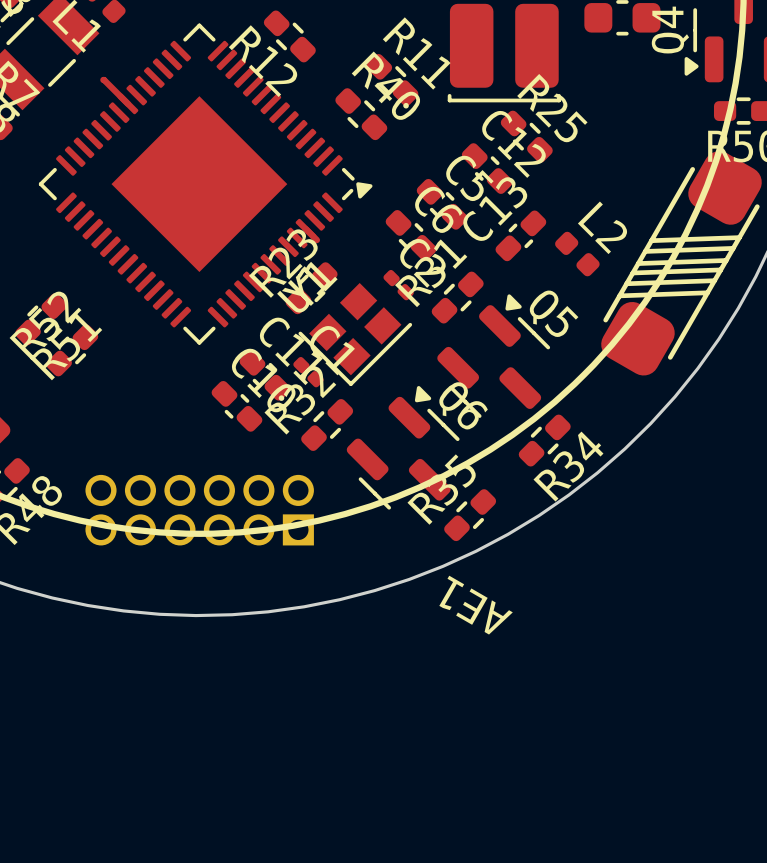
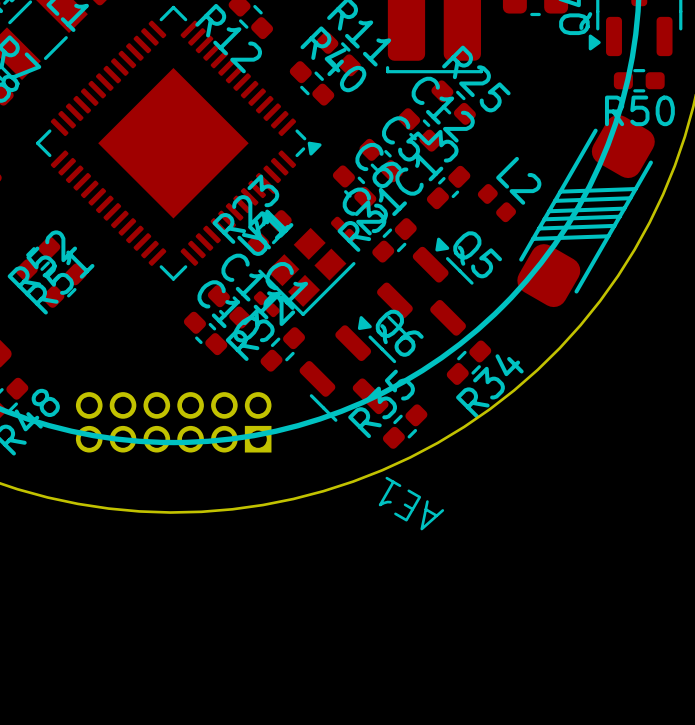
track: (103, 79) (127, 103) -> none

